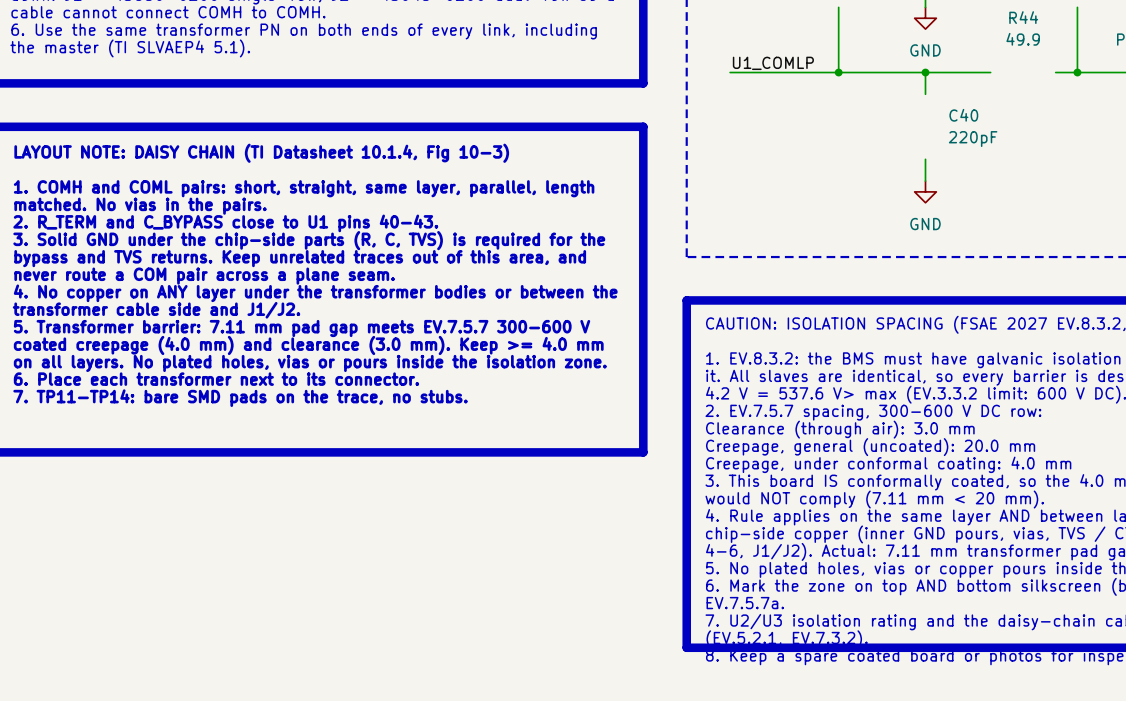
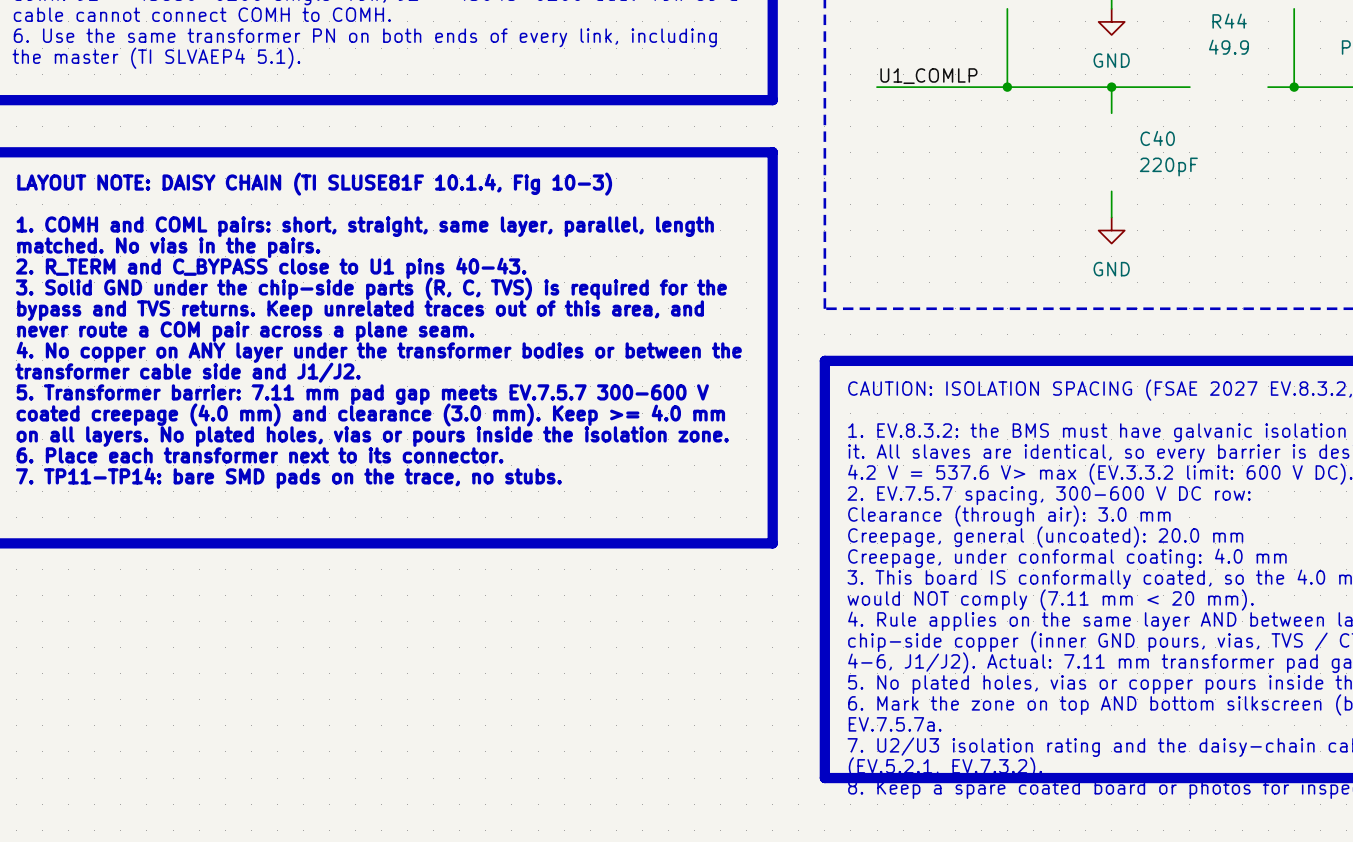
text: LAYOUT NOTE: DAISY CHAIN (TI Datasheet 10.1.4, Fig 10-3) (261, 153) -> LAYOUT NOTE: DAISY CHAIN (TI SLUSE81F 10.1.4, Fig 10-3) (314, 184)

